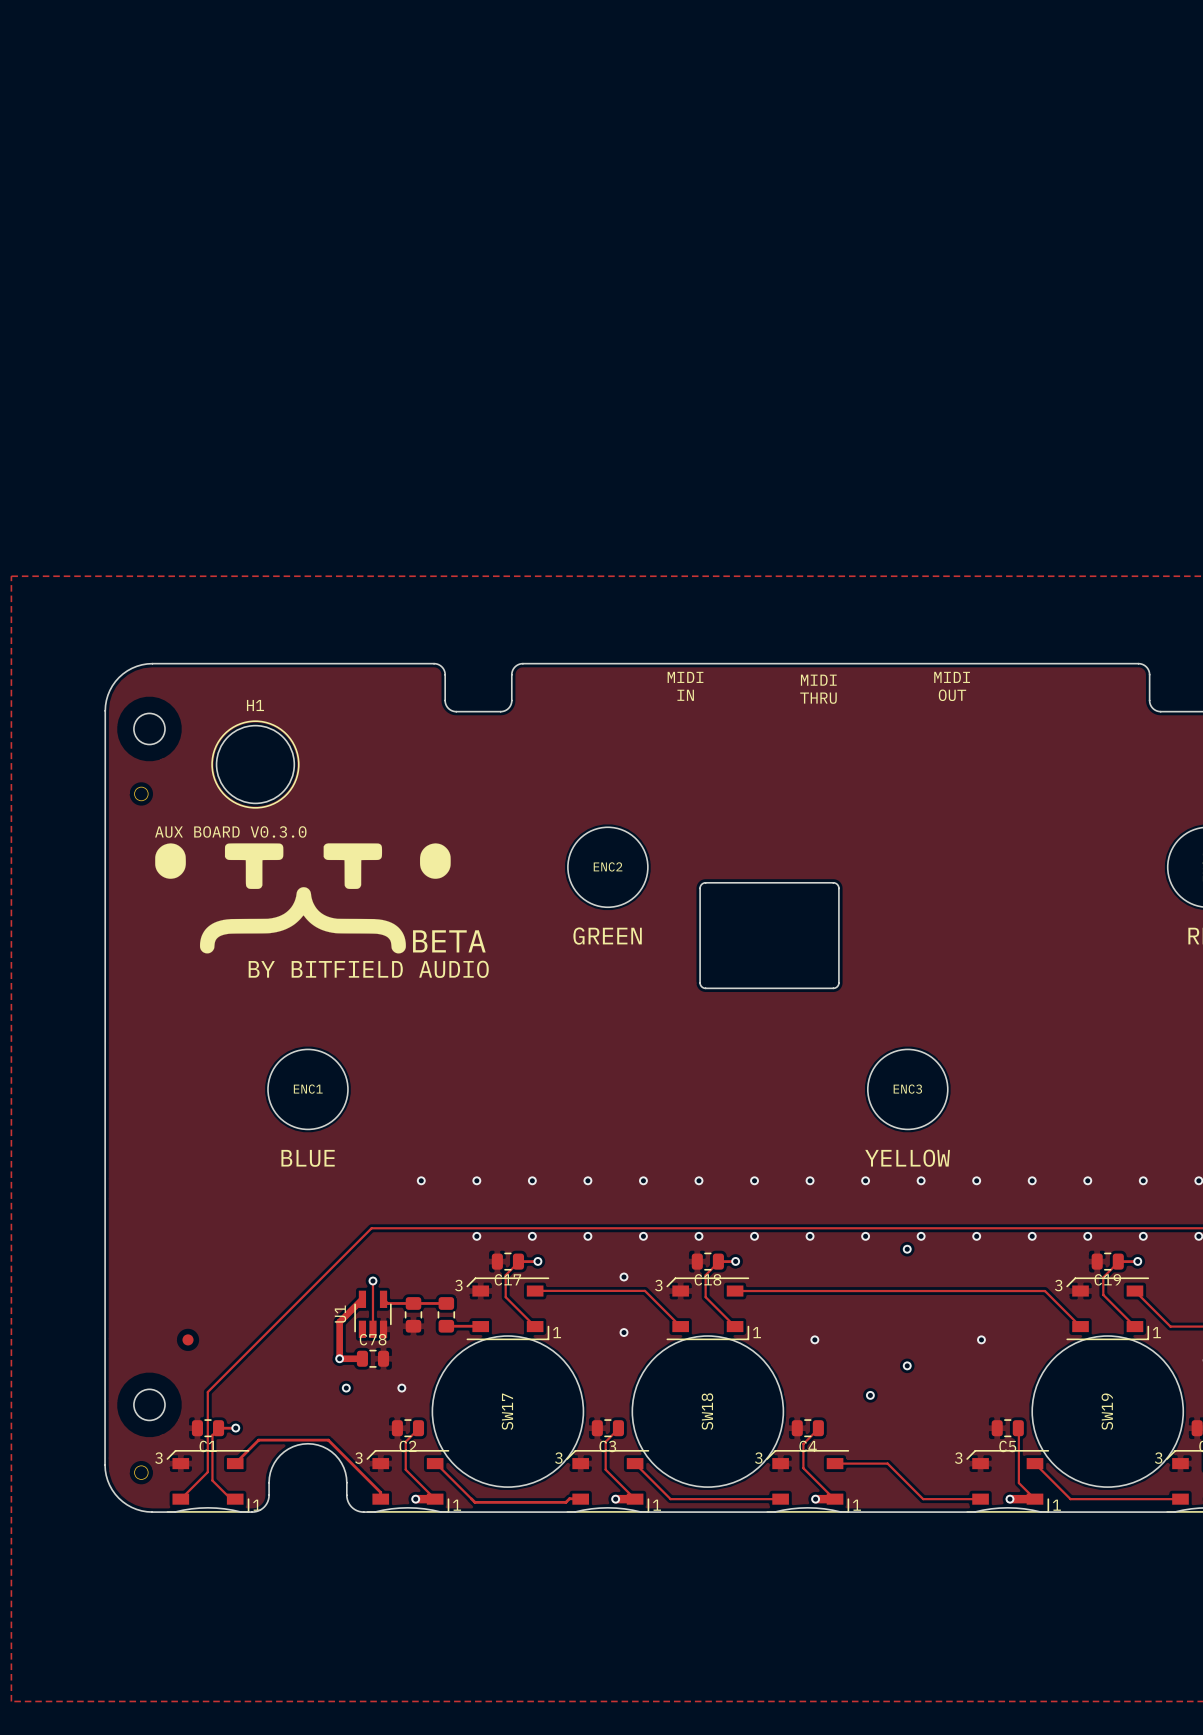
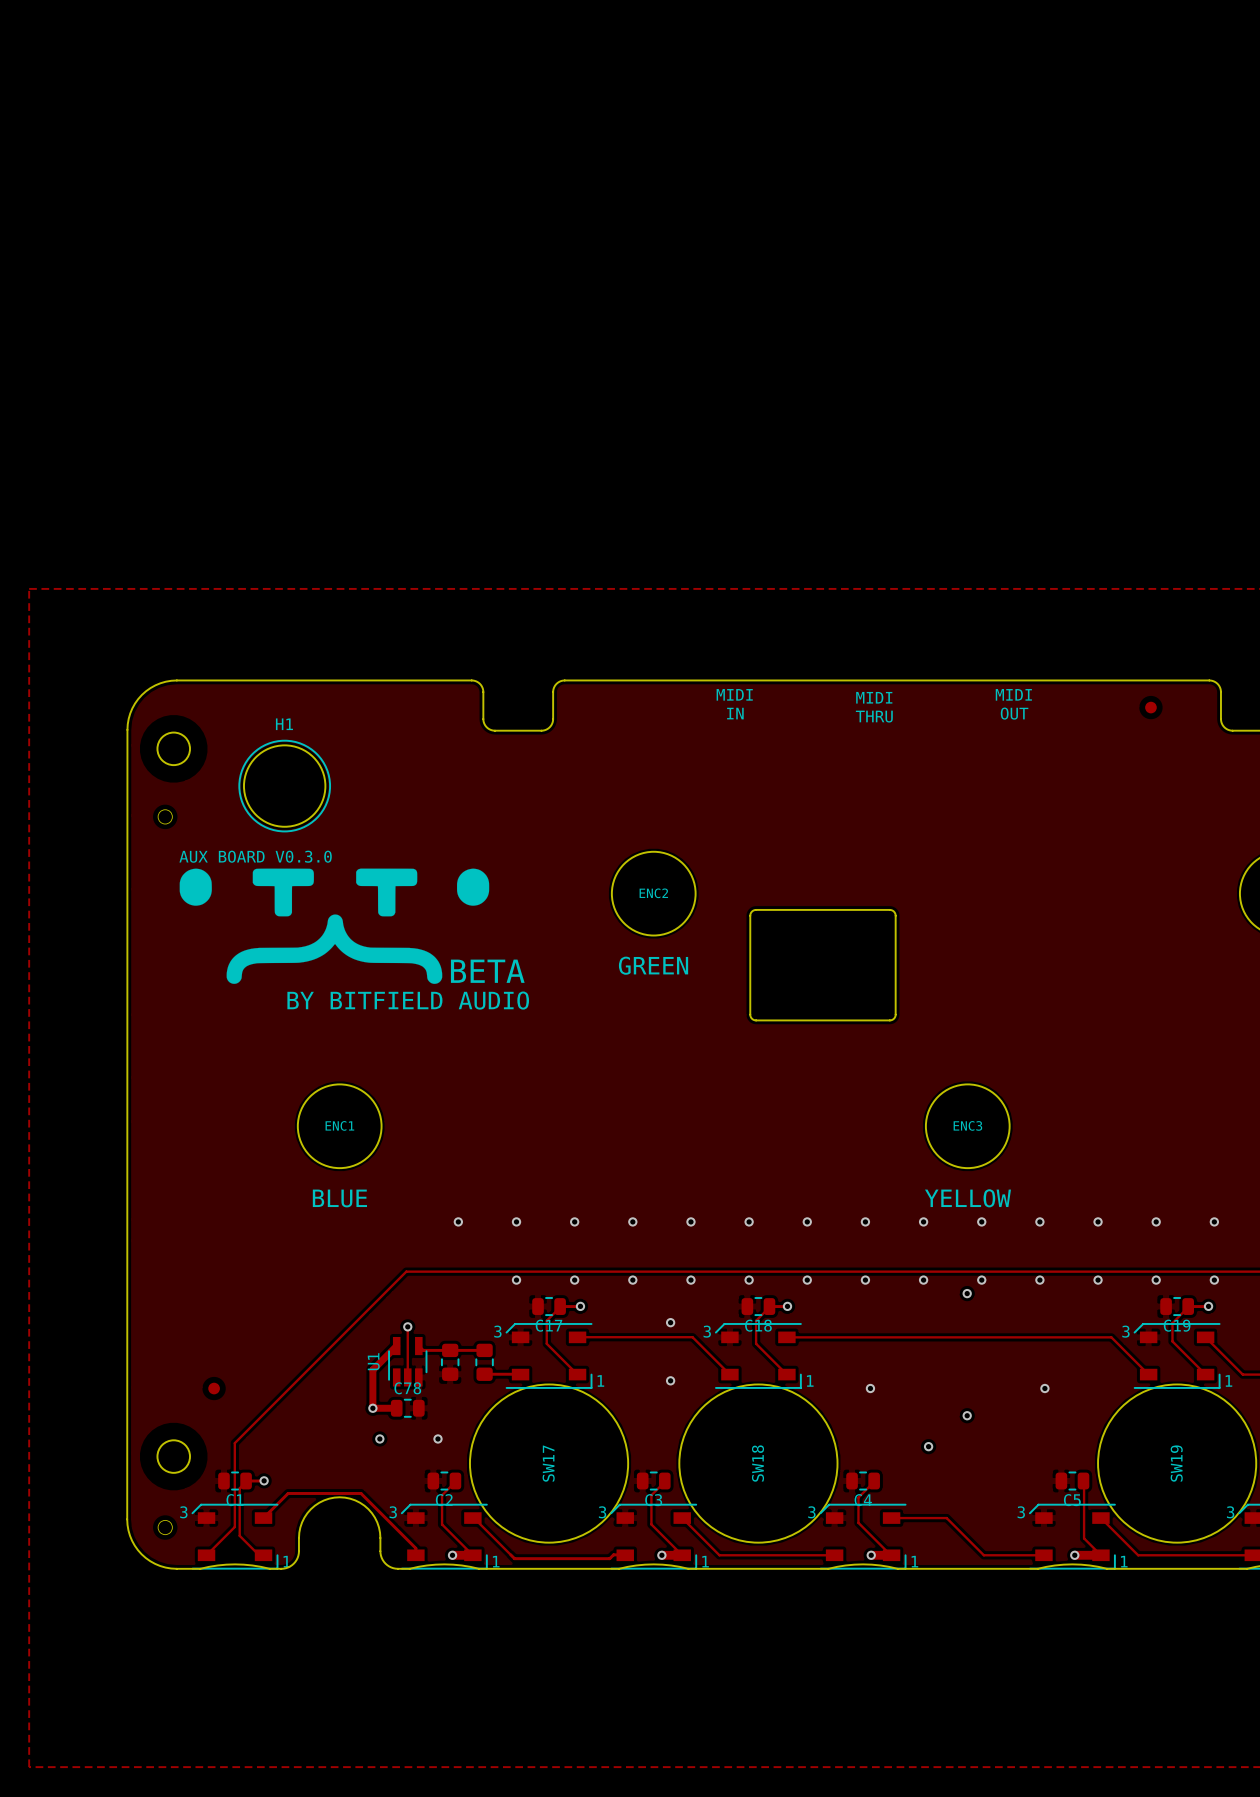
part: none -> (1150, 707)

